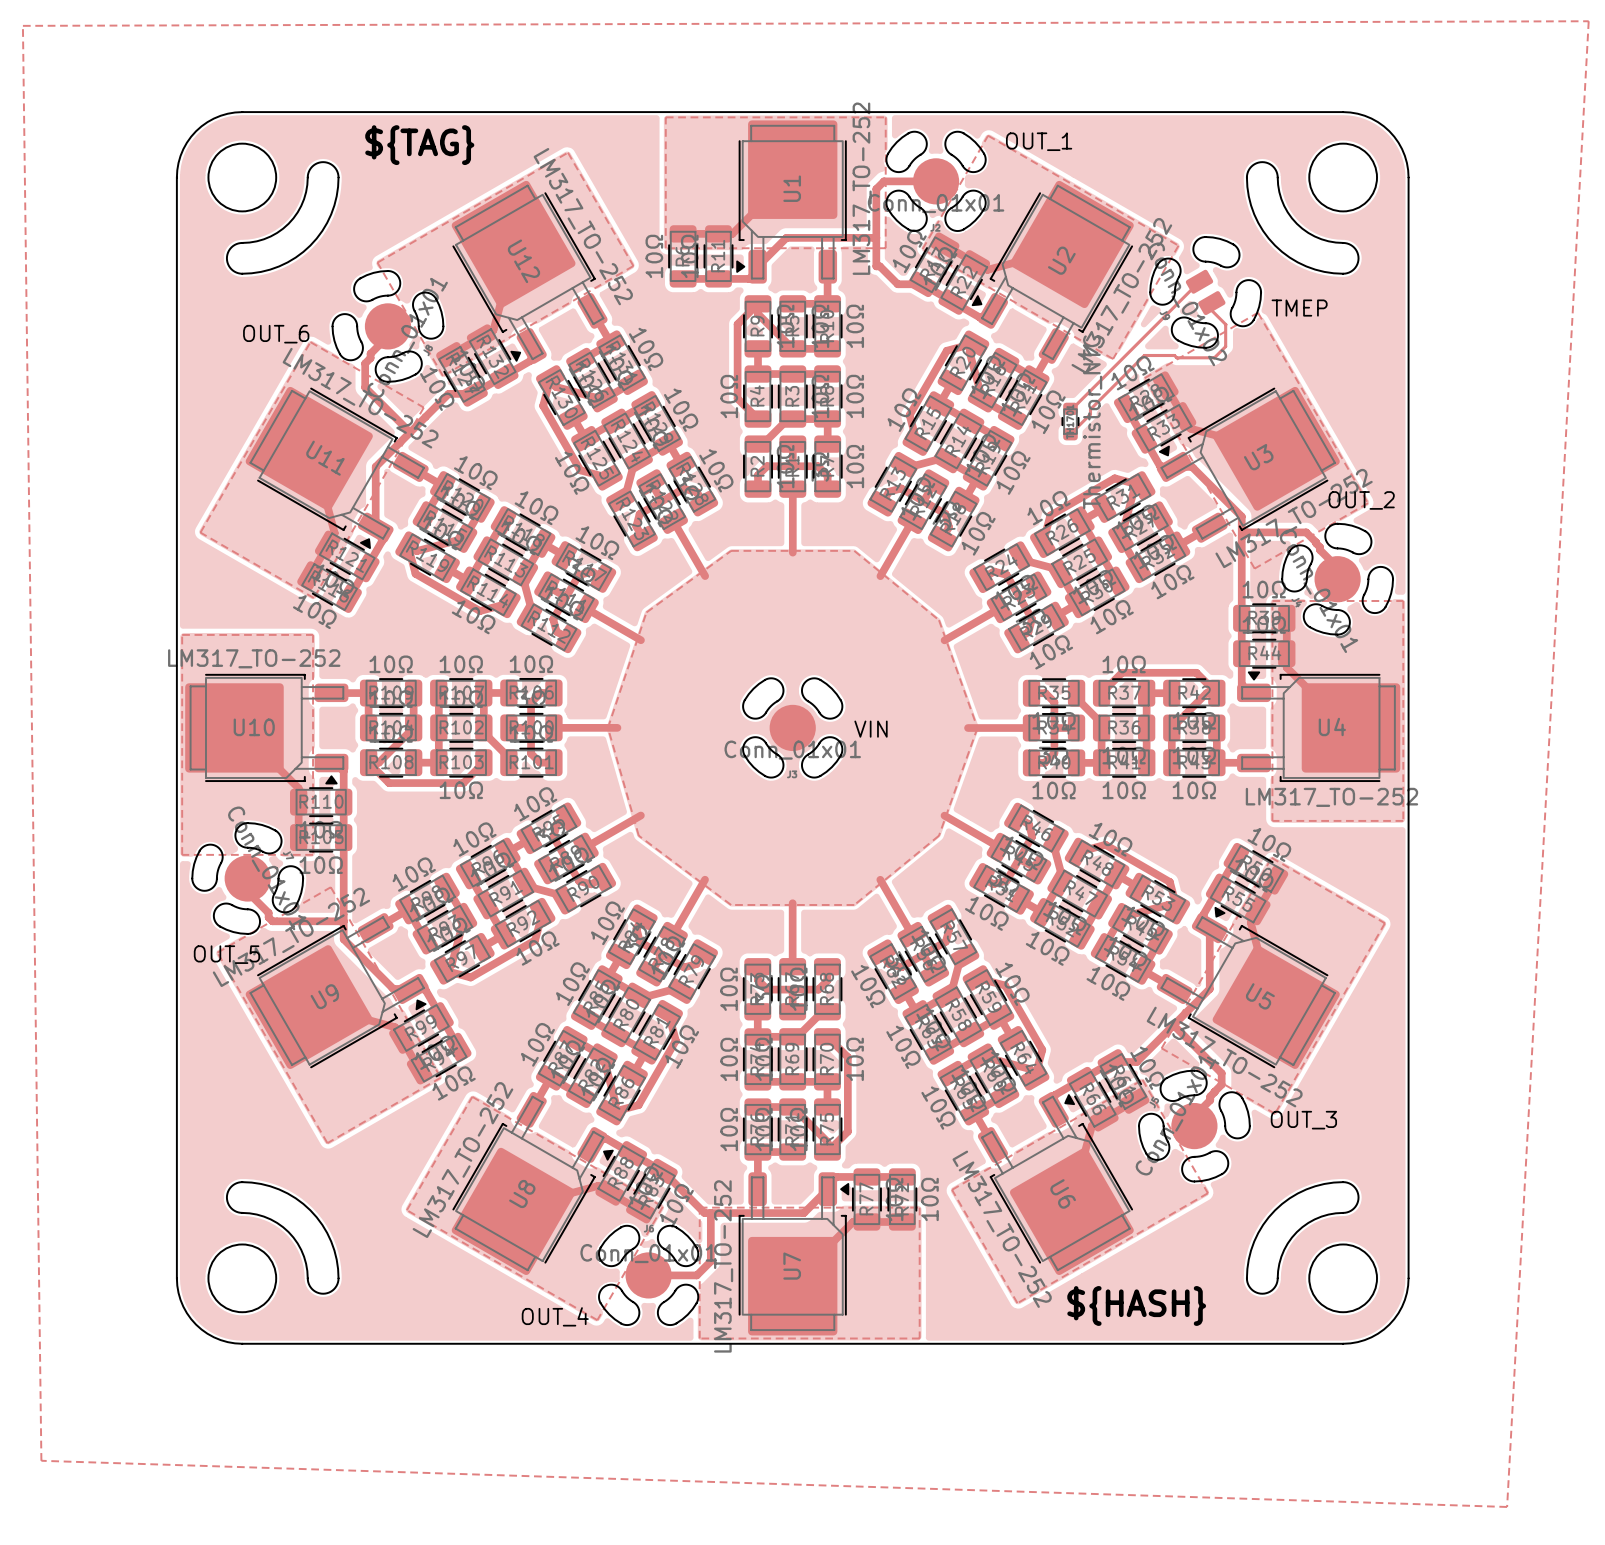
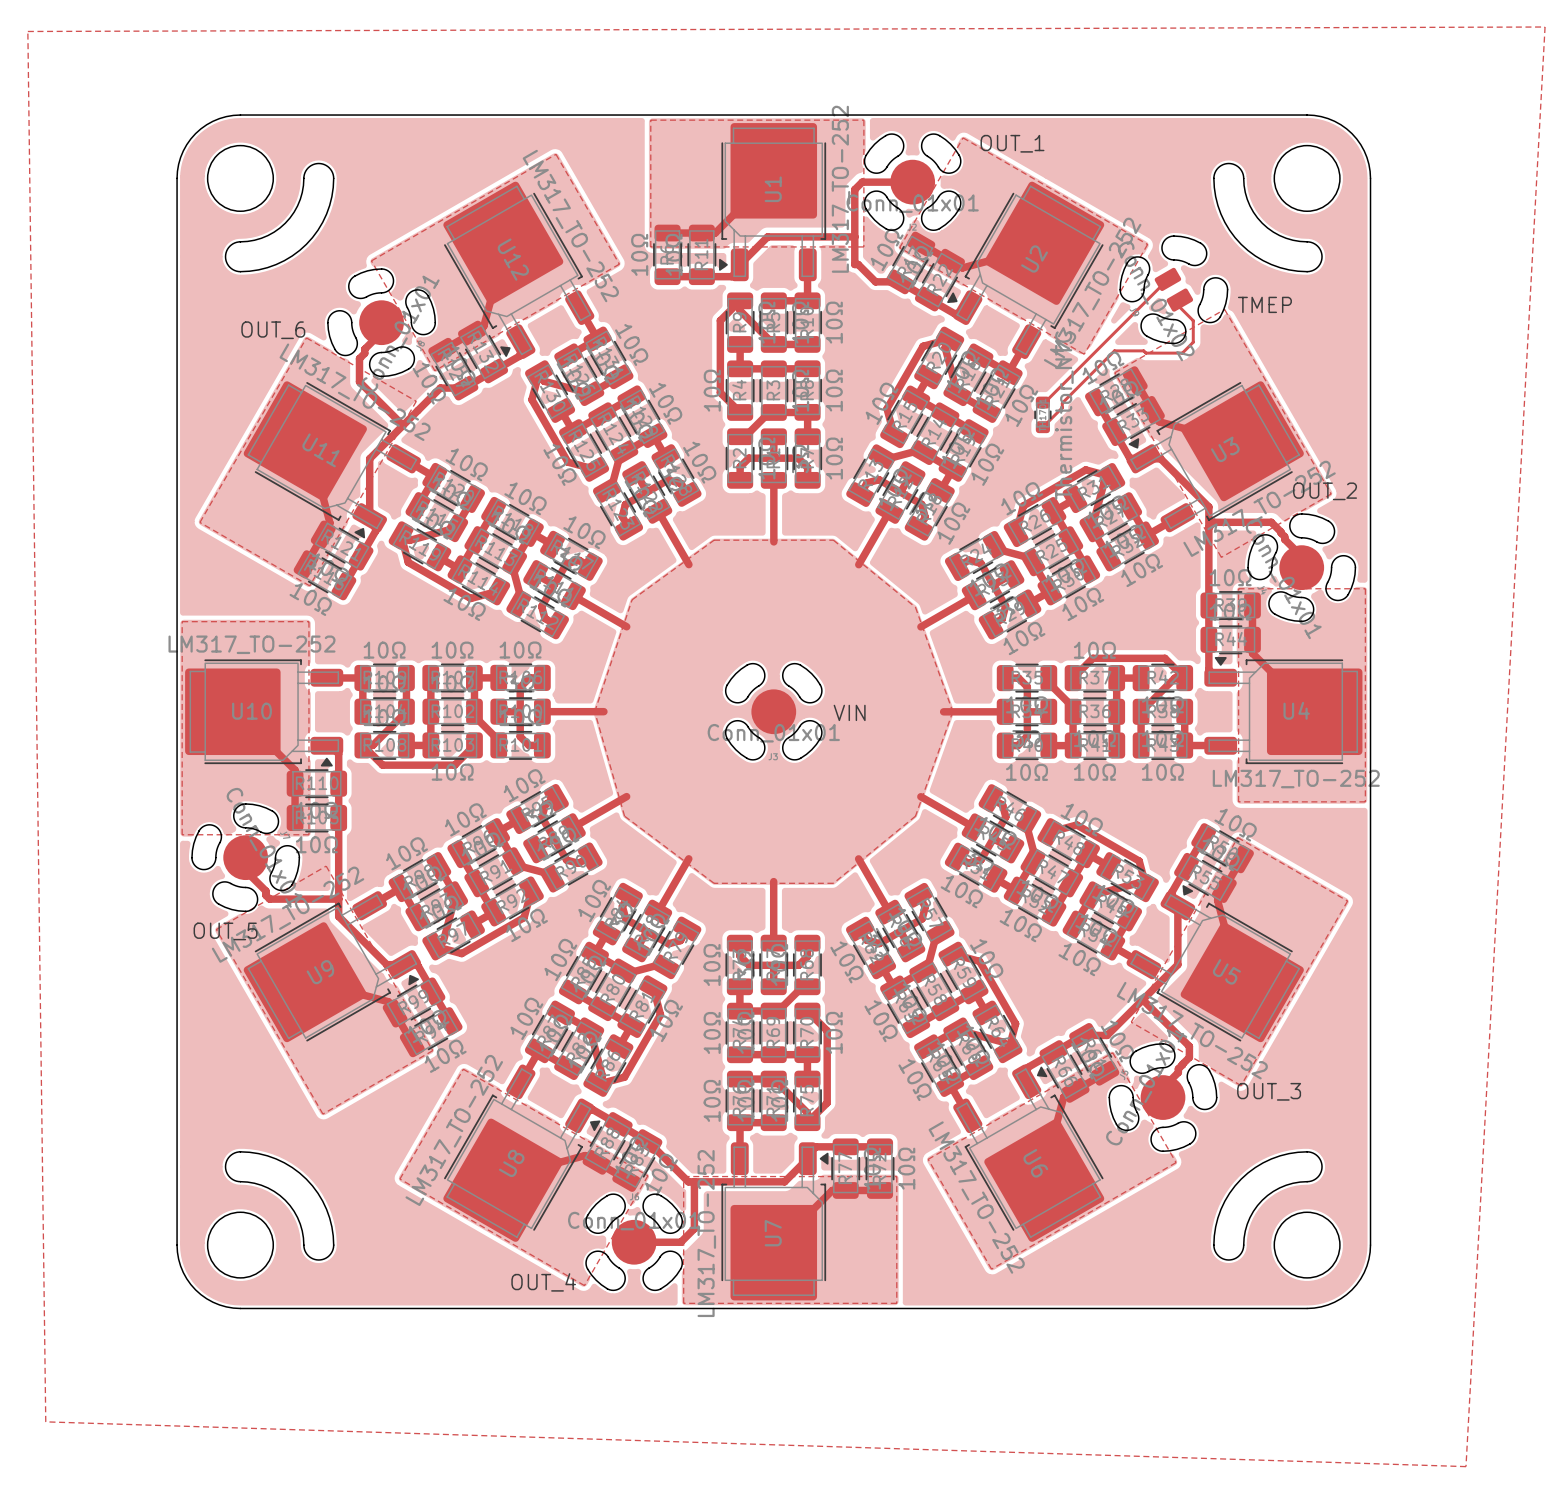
text: ${TAG} (419, 145) -> none
text: ${HASH} (1136, 1305) -> none

